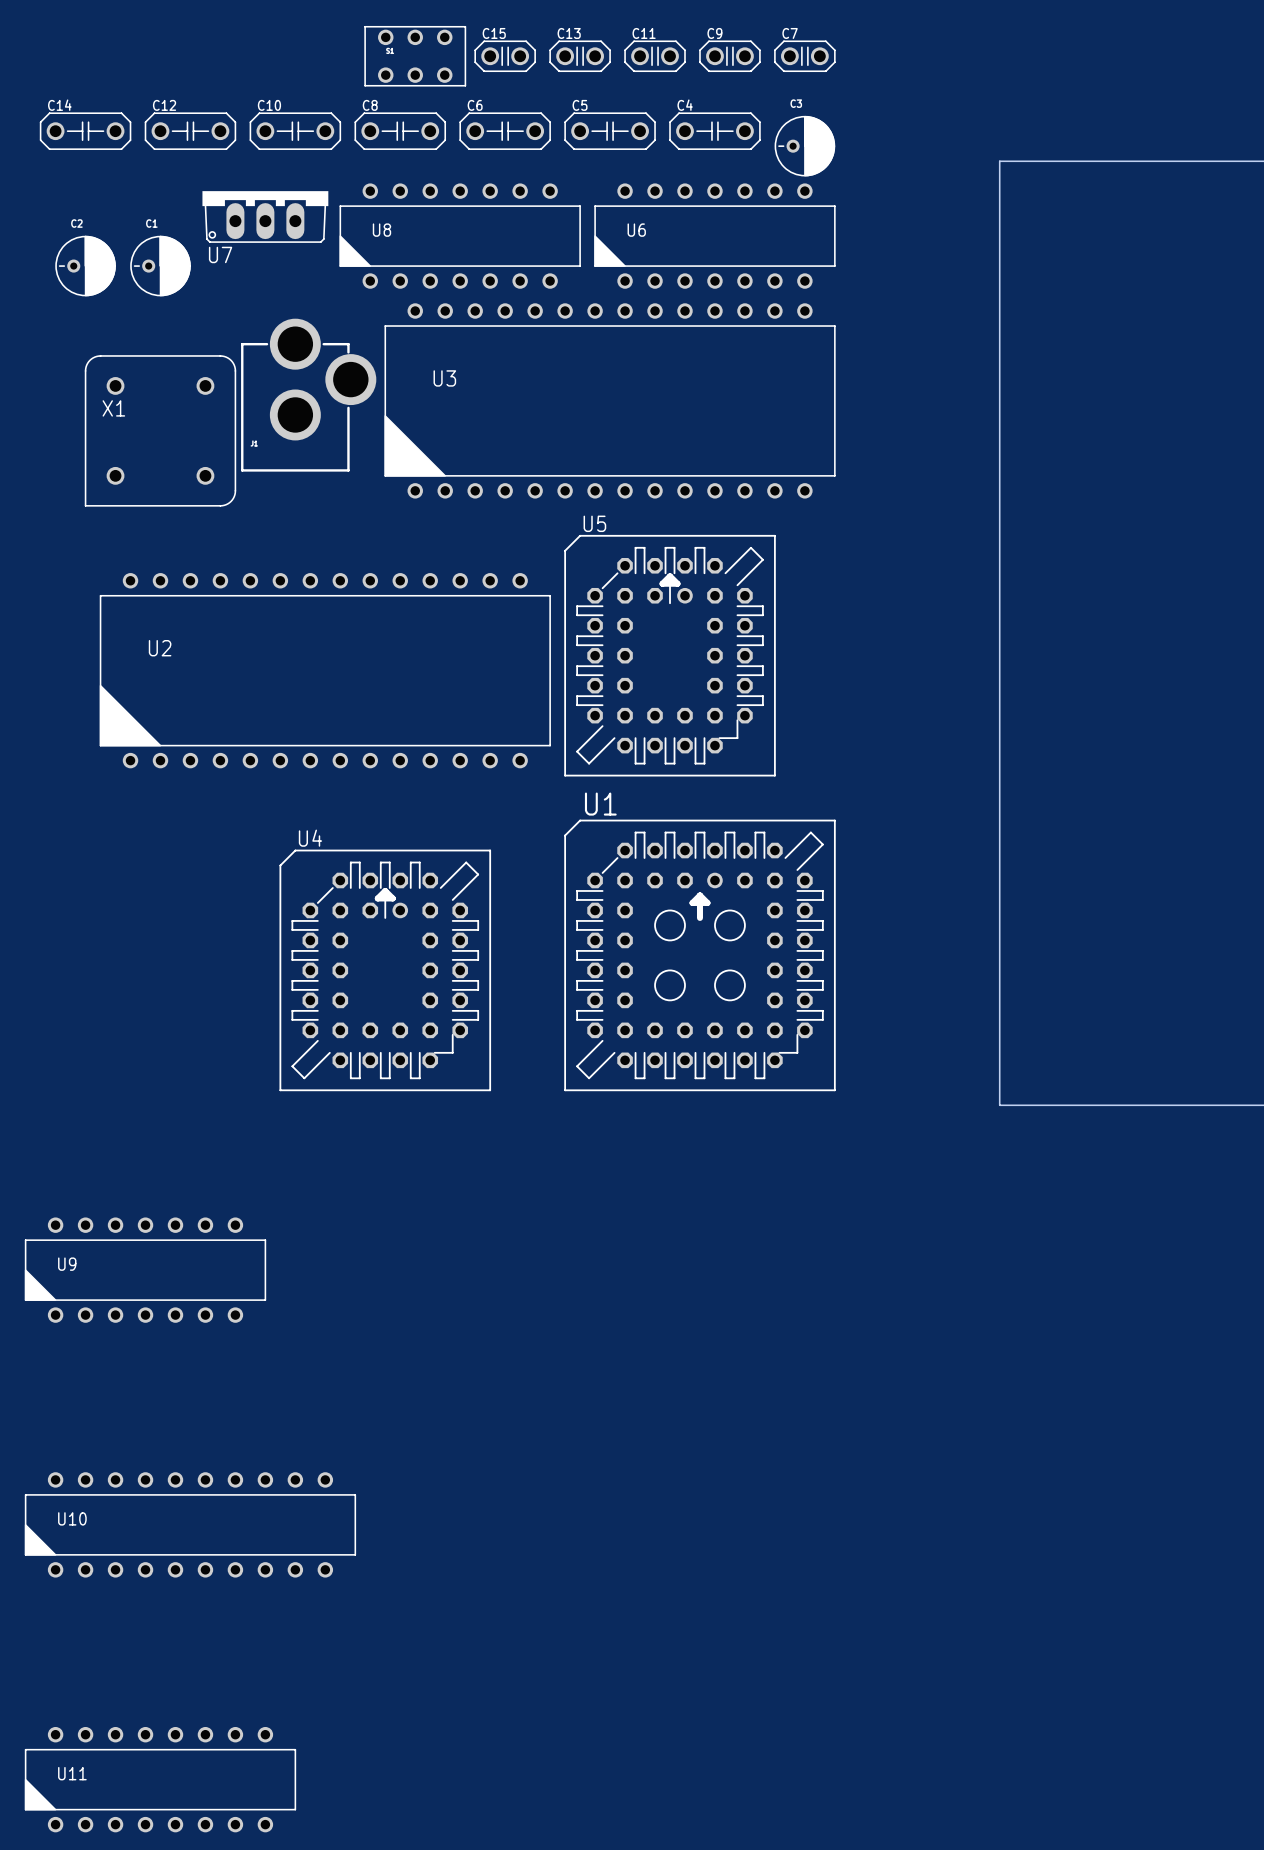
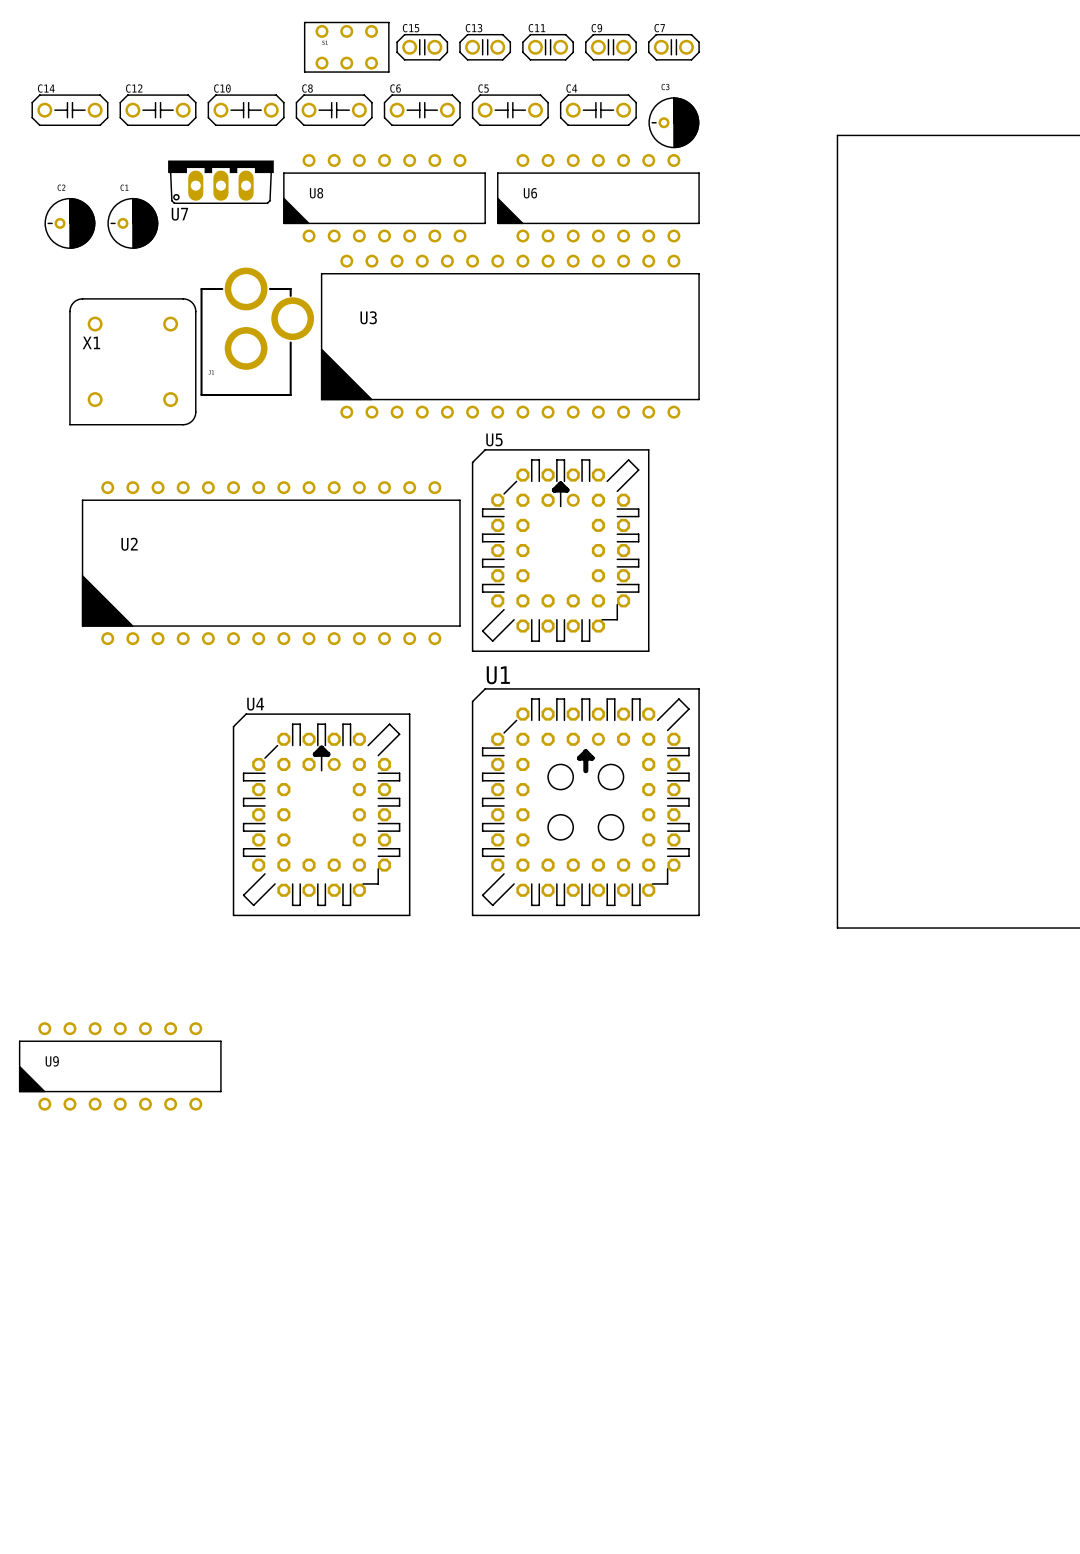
U10: (190, 1524) -> none
U11: (160, 1779) -> none

